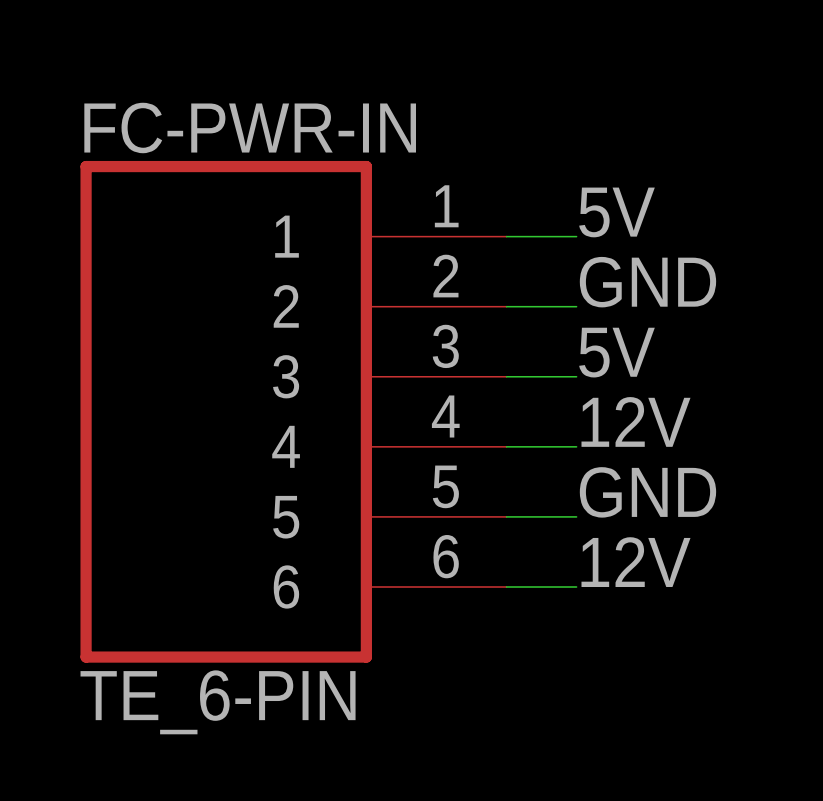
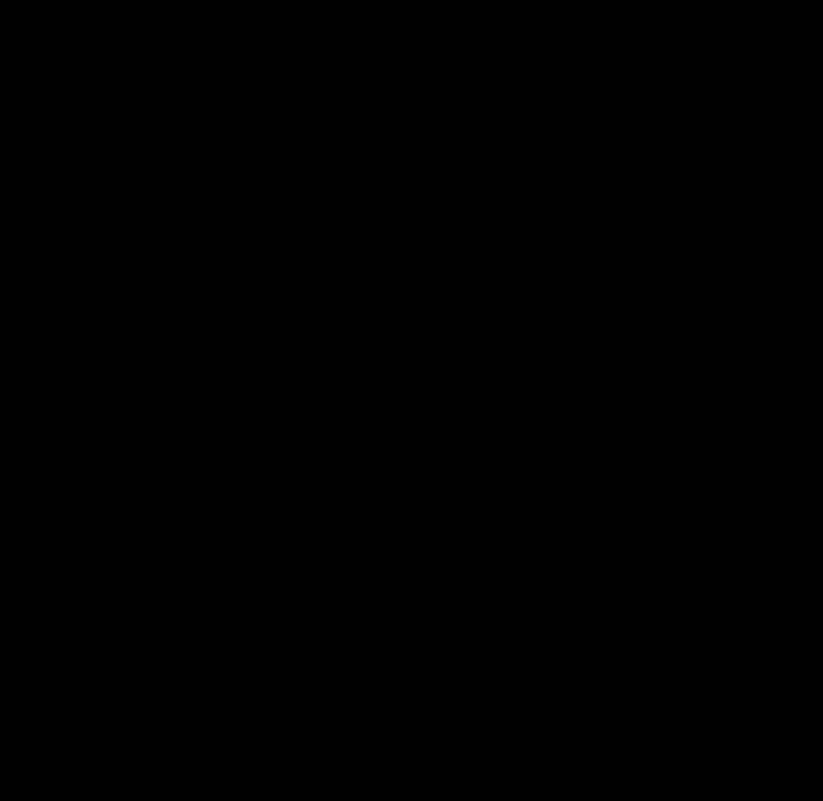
label: 5V (616, 212) -> none
wire: (506, 236) (576, 236) -> none
label: GND (647, 282) -> none
wire: (506, 306) (576, 306) -> none
label: 5V (616, 352) -> none
wire: (506, 376) (576, 376) -> none
FC-PWR-IN: TE_6-PIN (293, 411) -> none
label: 12V (636, 421) -> none
wire: (506, 446) (576, 446) -> none
label: GND (647, 492) -> none
wire: (506, 516) (576, 516) -> none
label: 12V (636, 562) -> none
wire: (506, 586) (576, 586) -> none

